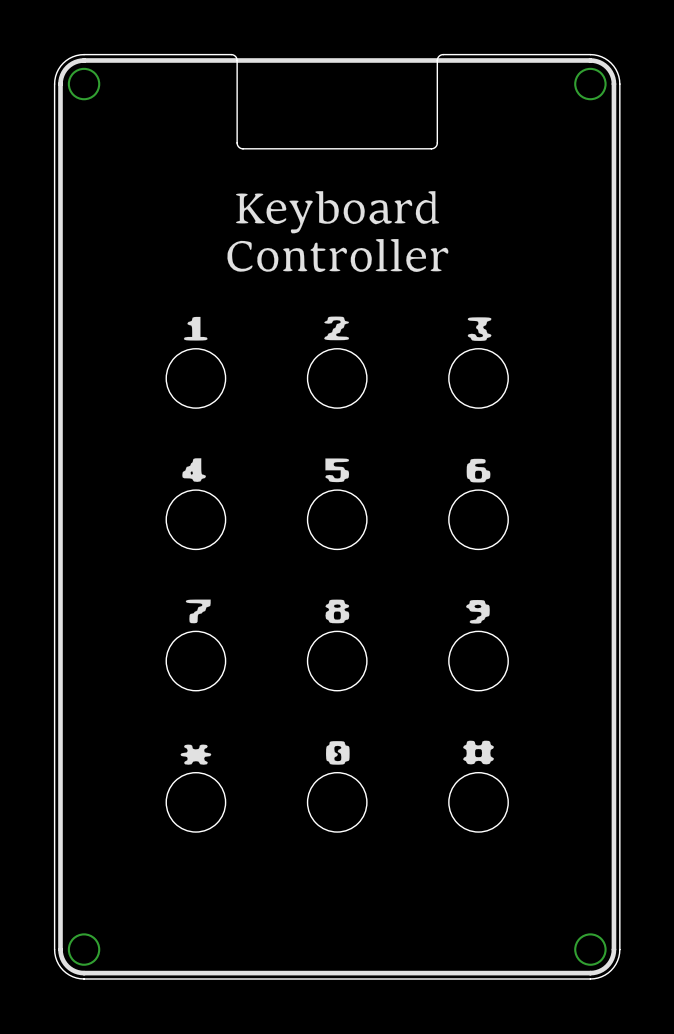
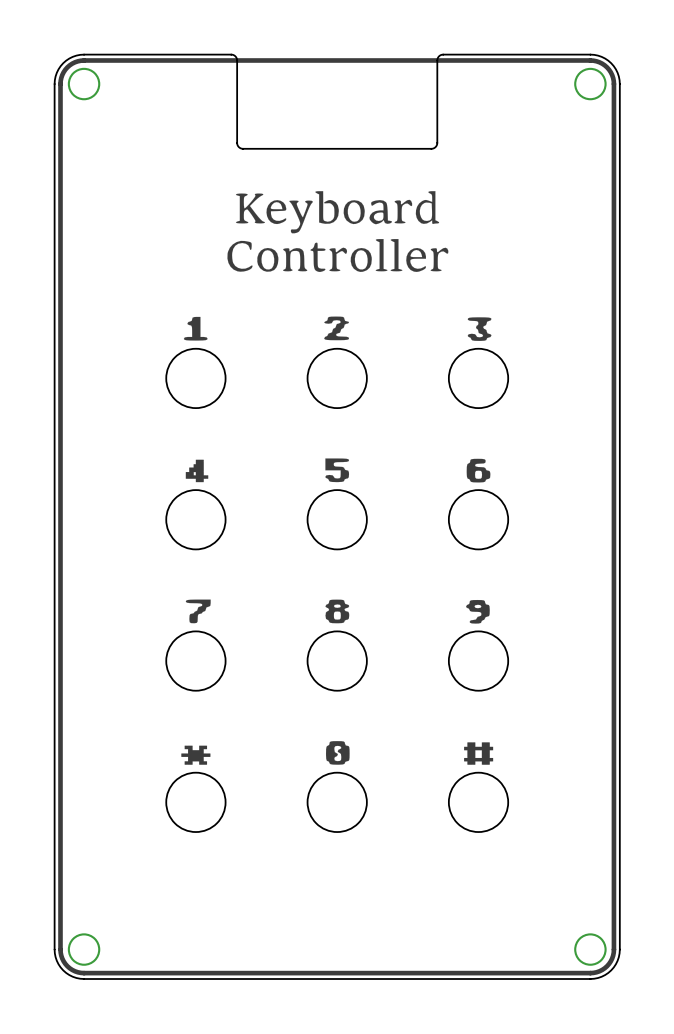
drawing shape: [182, 458, 206, 482] -> [185, 459, 209, 483]
drawing shape: [463, 740, 494, 765] -> [464, 742, 494, 765]
drawing shape: [180, 744, 212, 765] -> [181, 745, 211, 765]

